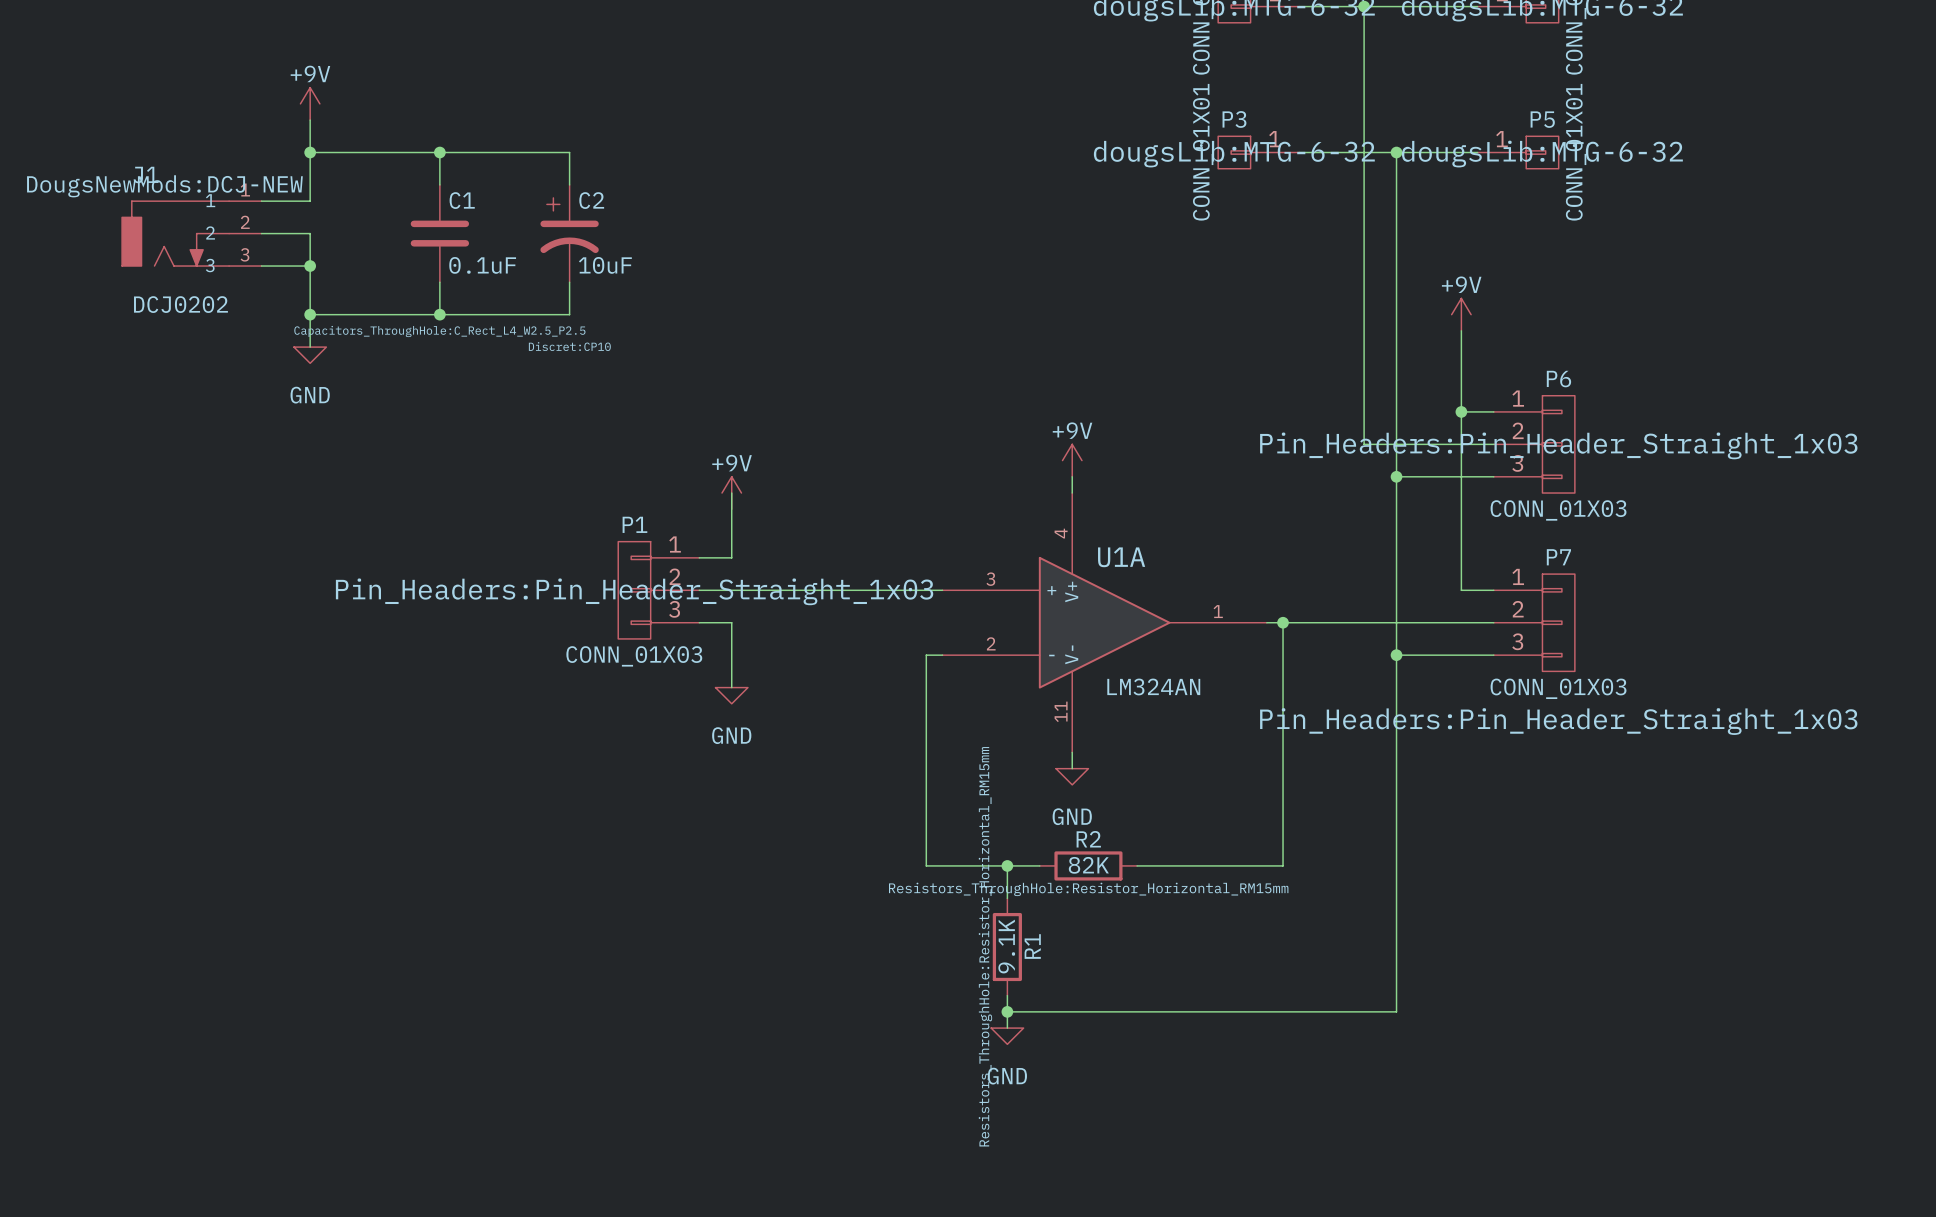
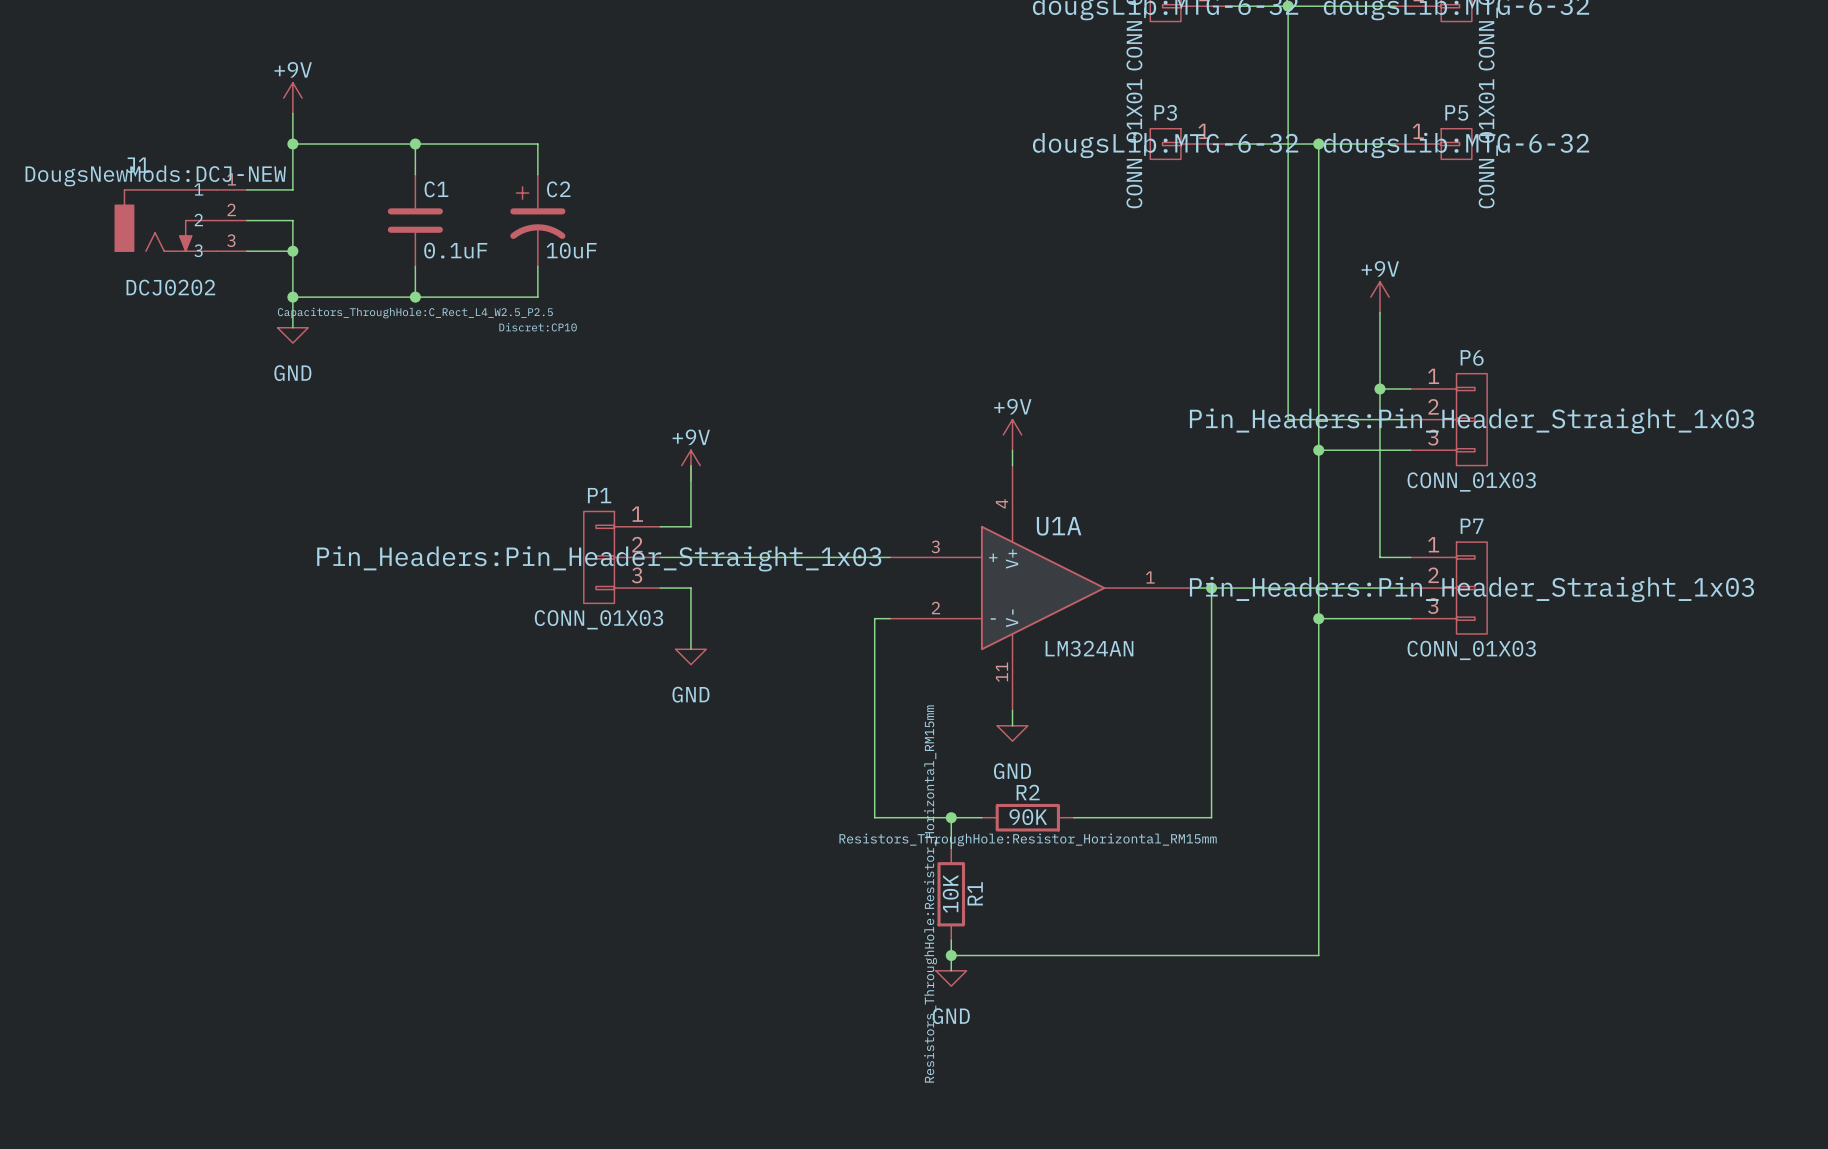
P7 text position: Pin_Headers:Pin_Header_Straight_1x03 (1558, 721) -> Pin_Headers:Pin_Header_Straight_1x03 (1471, 589)
R2 value: 82K (1088, 865) -> 90K (1028, 817)
R1 value: 9.1K (1006, 946) -> 10K (950, 893)

